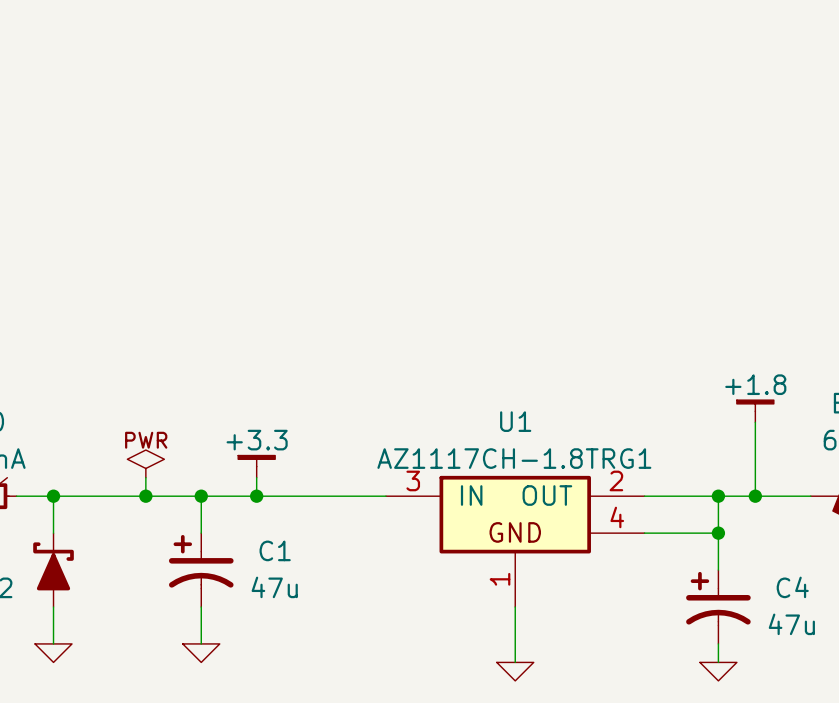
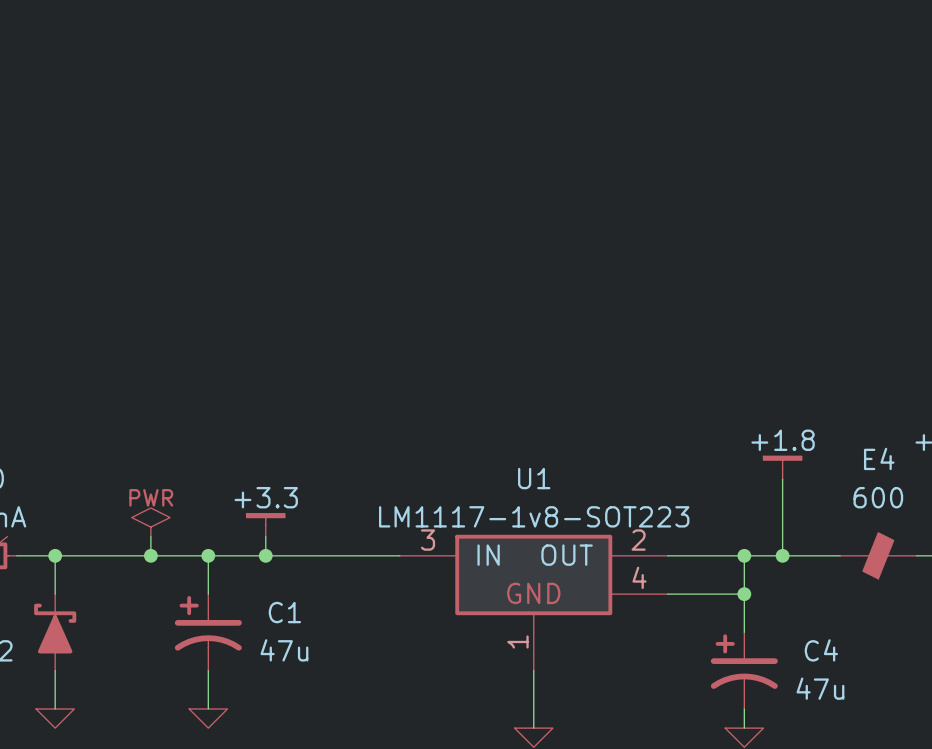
U1 value: AZ1117CH-1.8TRG1 (514, 458) -> LM1117-1v8-SOT223 (534, 516)

